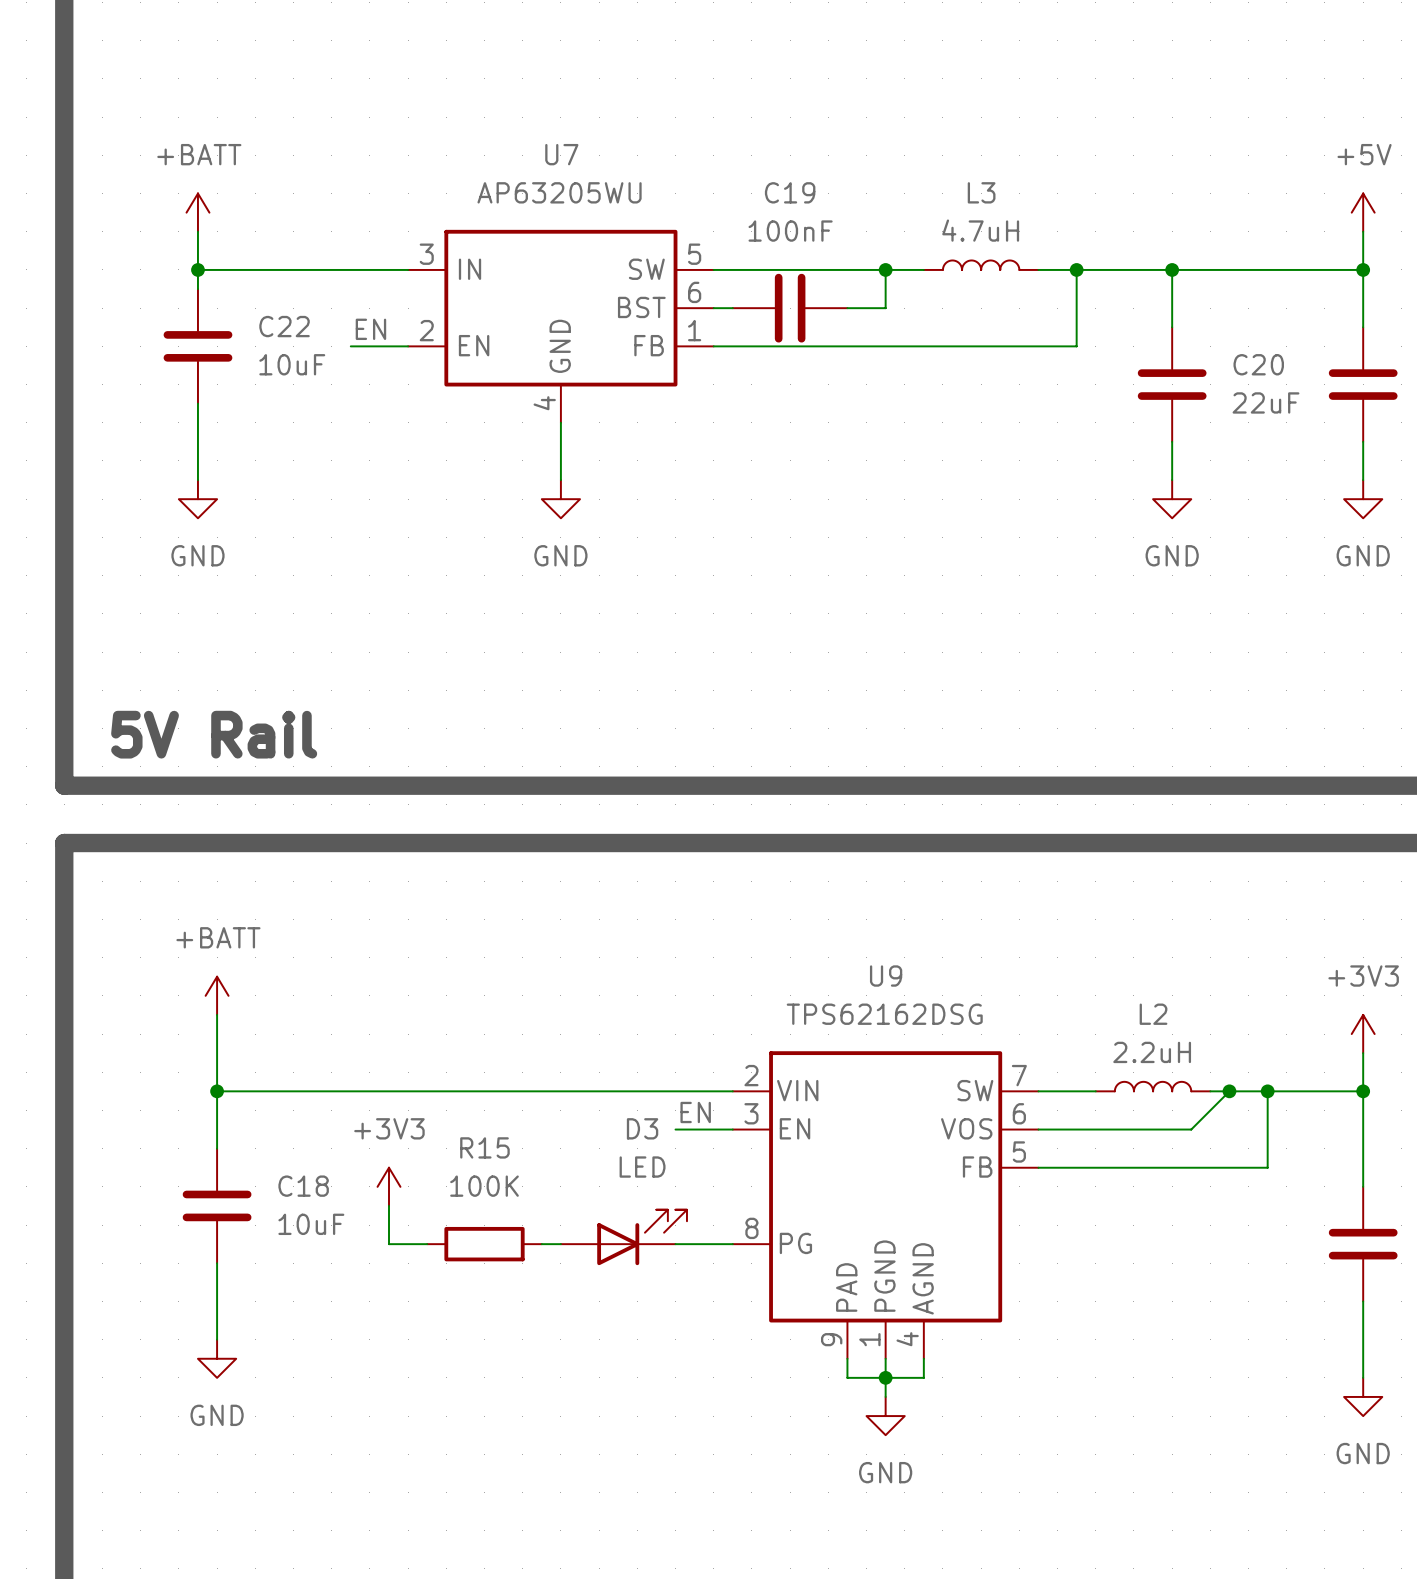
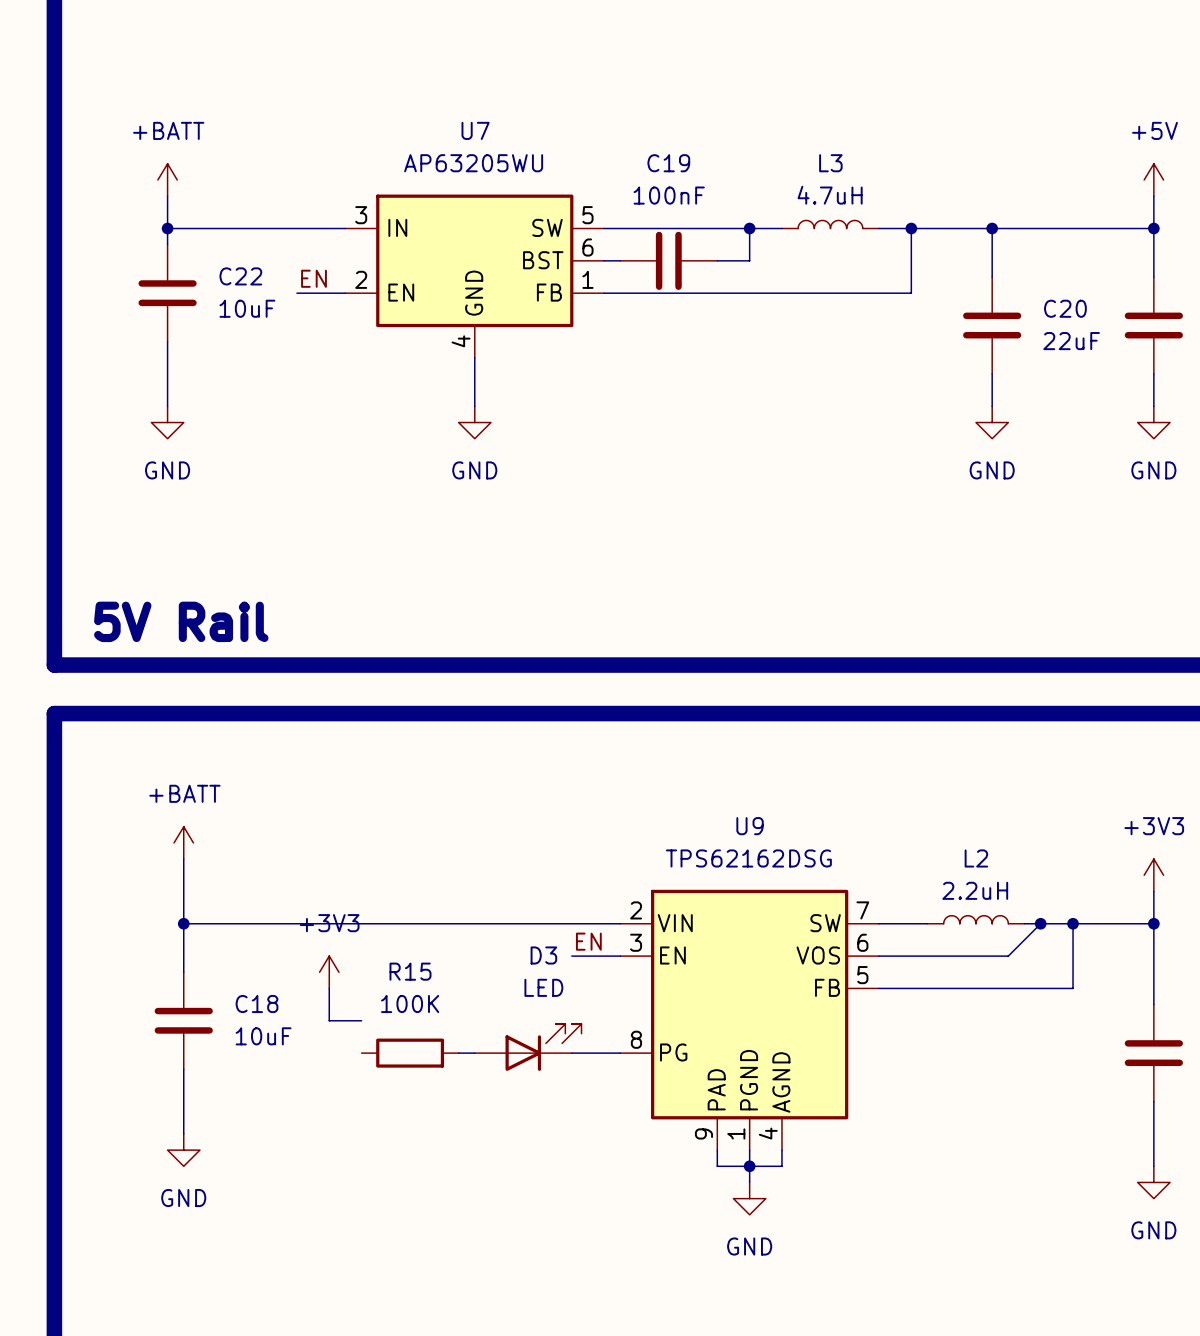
power symbol position: +3V3 (389, 1186) -> +3V3 (329, 972)
wire: (389, 1205) (389, 1244) (427, 1244) -> (329, 988) (329, 1020) (361, 1020)

